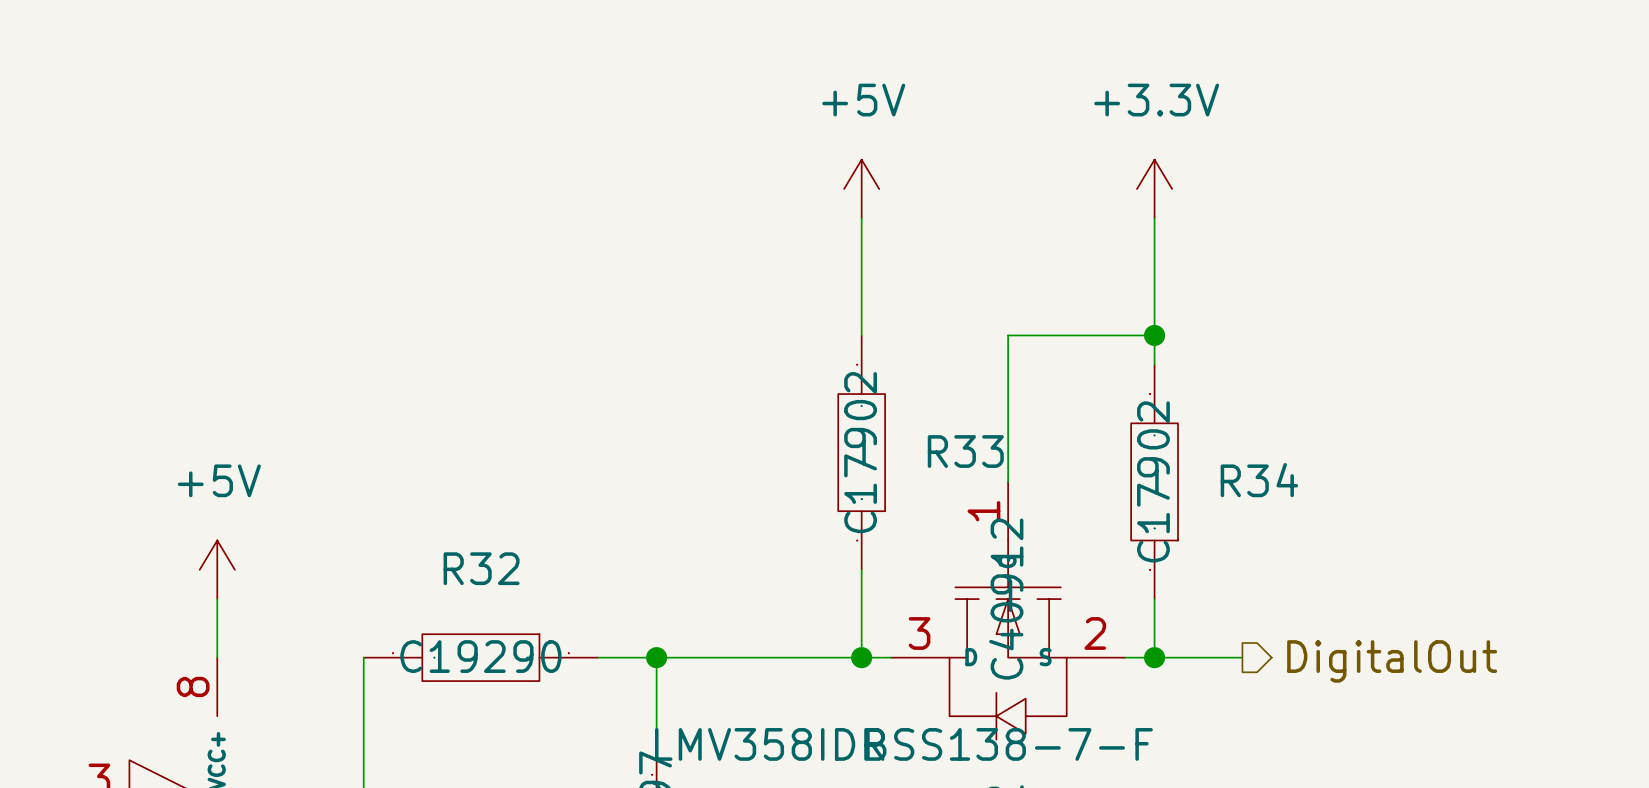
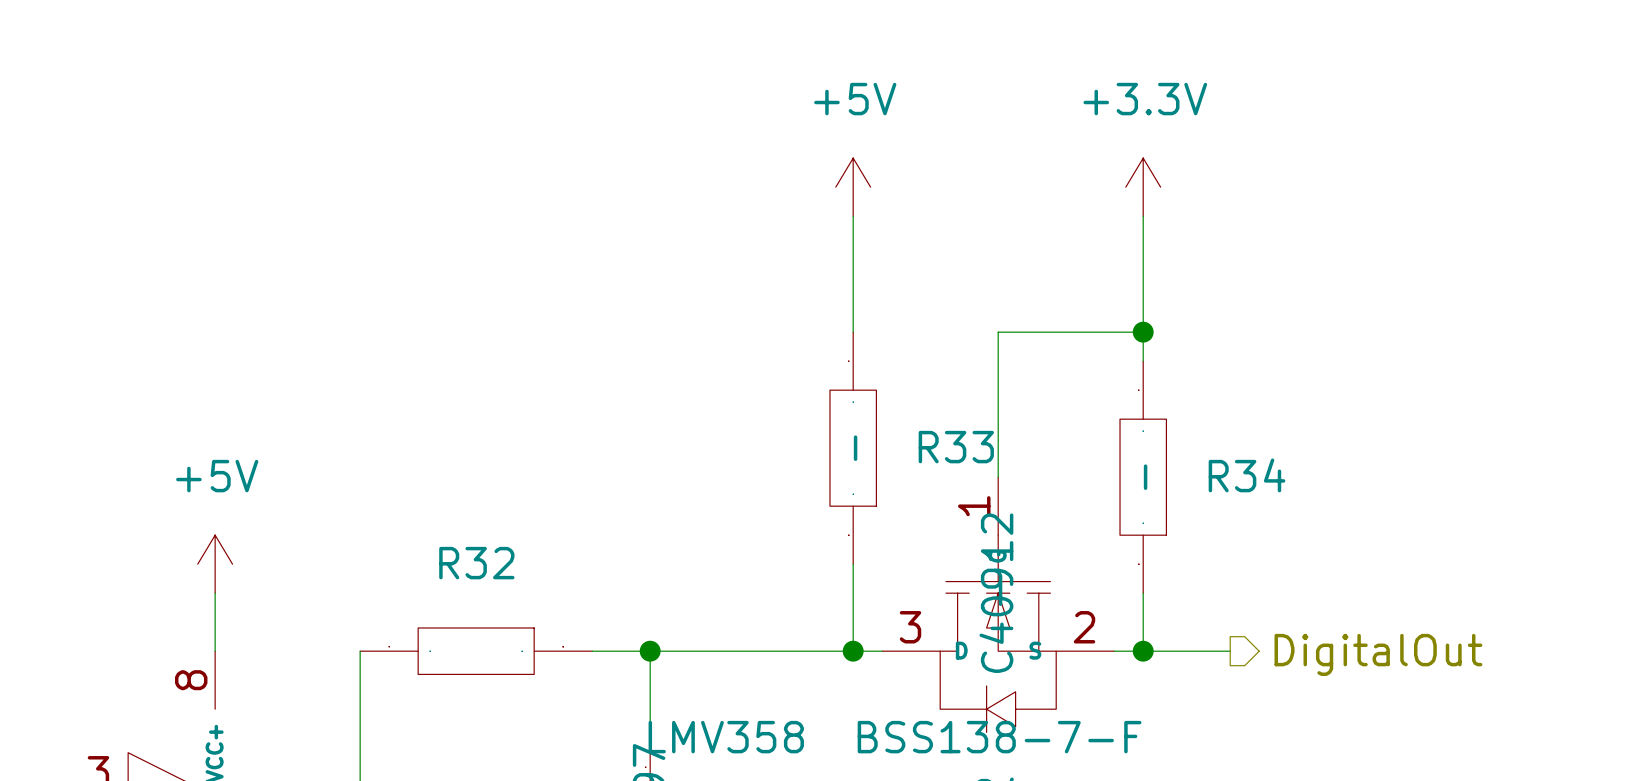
R33 text: C17902 (860, 452) -> none
R34 text: C17902 (1153, 481) -> none
R32 text: C19290 (480, 656) -> none
part value: LMV358IDR (769, 744) -> LMV358 (726, 737)

